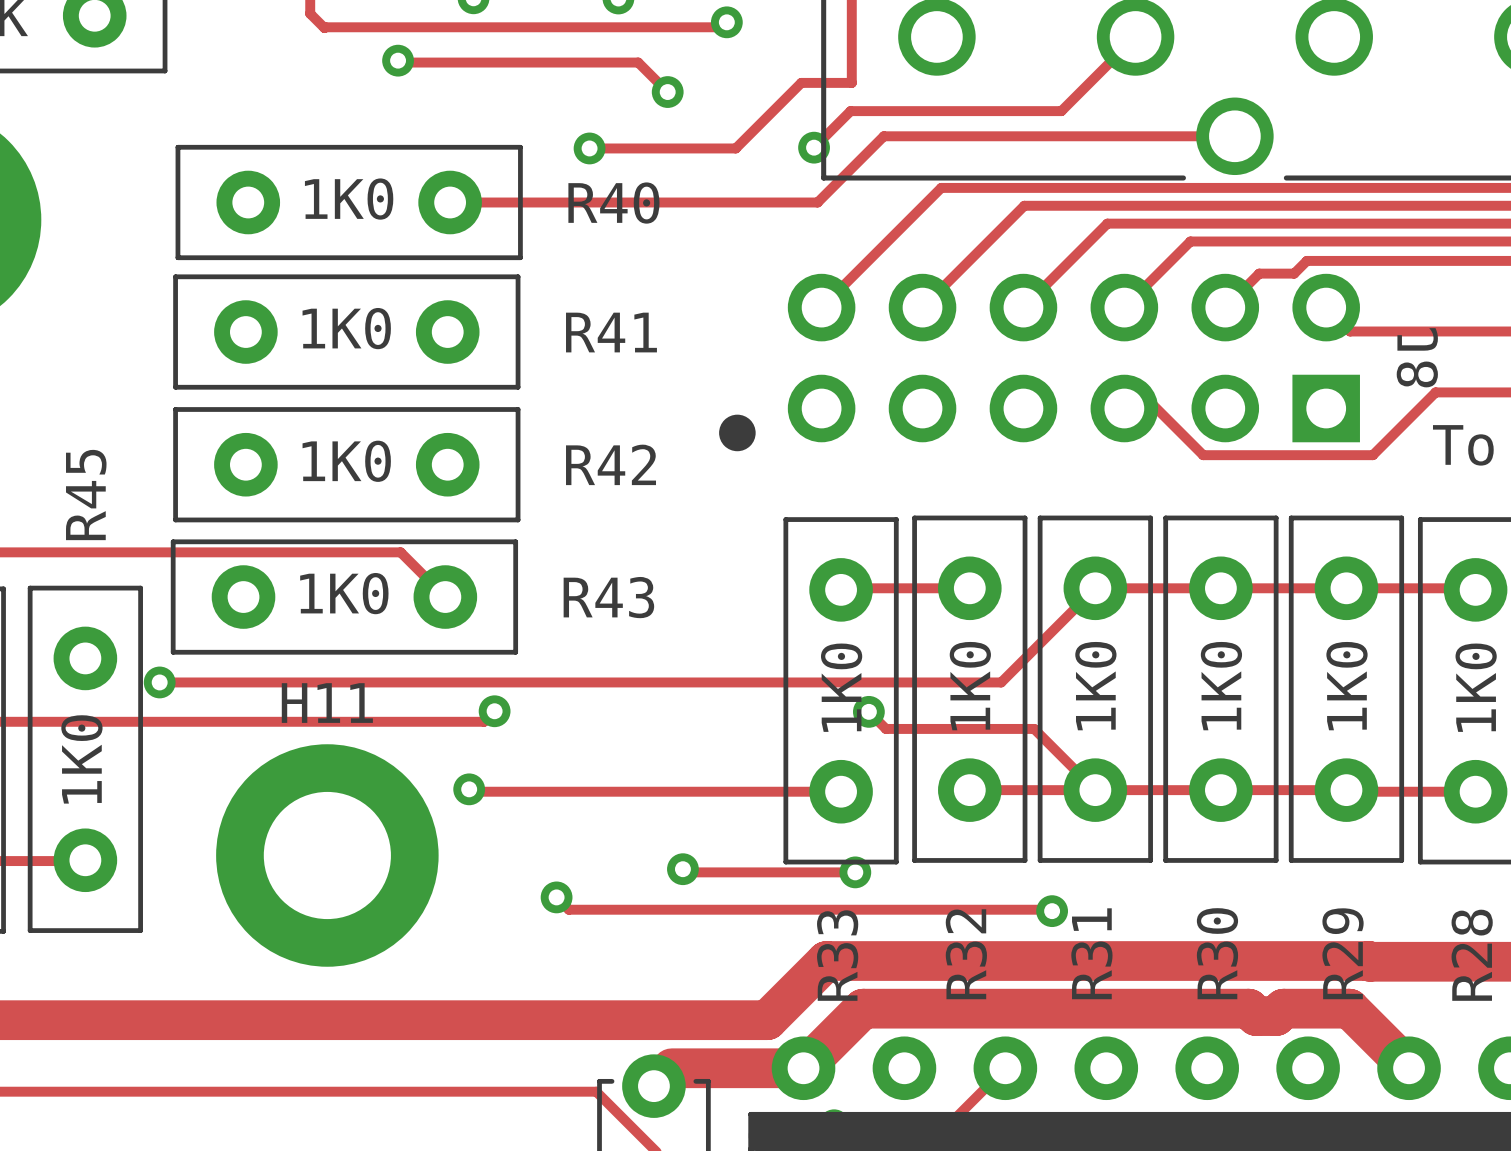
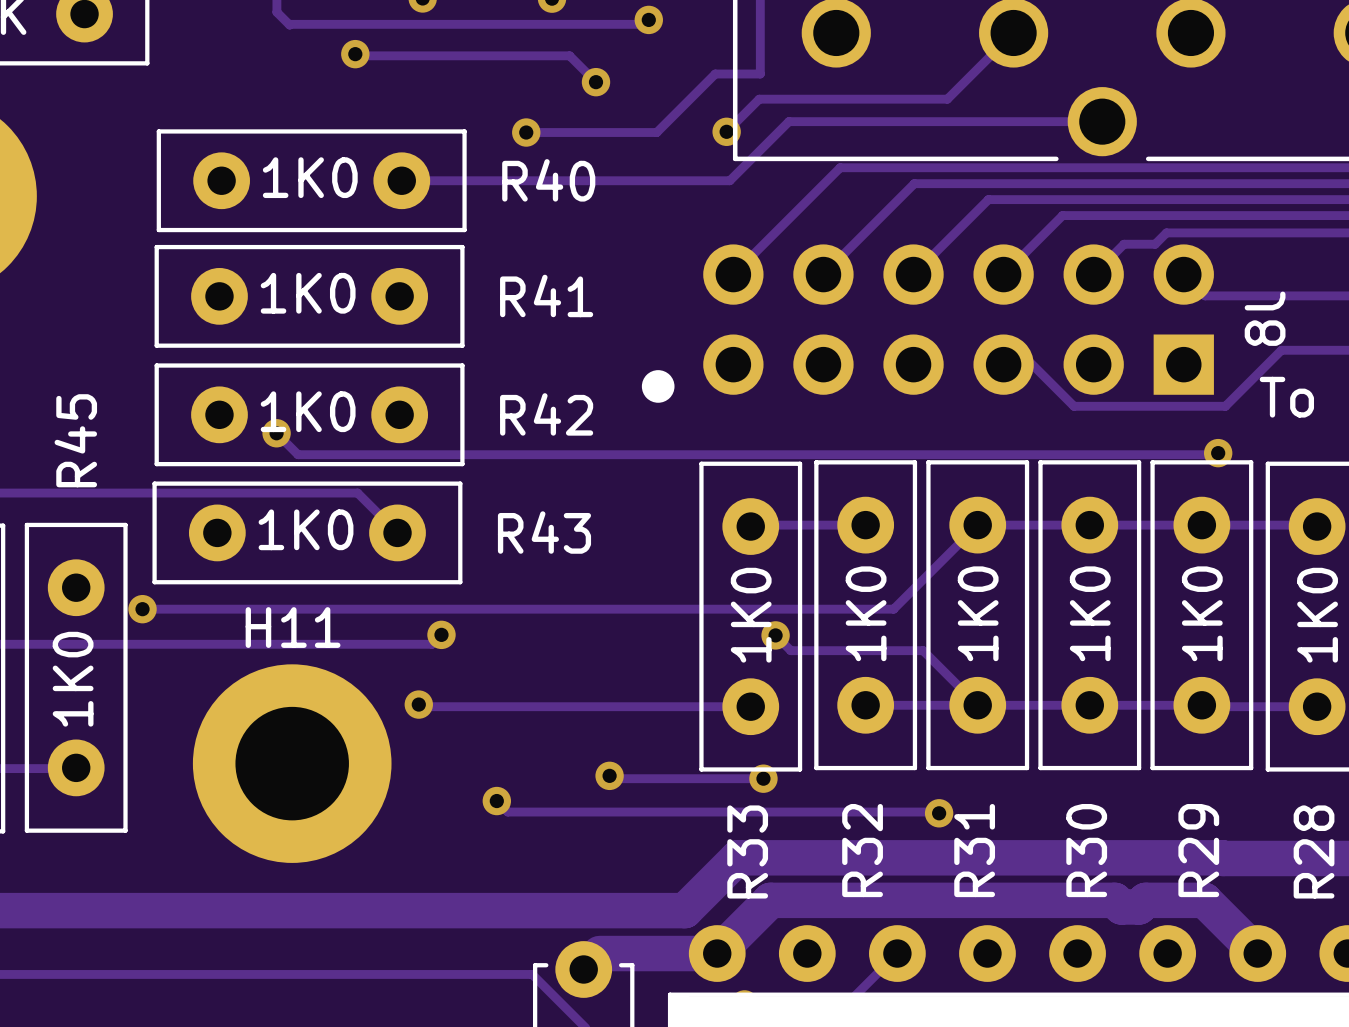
track: none -> (276, 433) (298, 454) (1216, 454) (1218, 453)
via: none -> (276, 433)
via: none -> (1218, 453)

